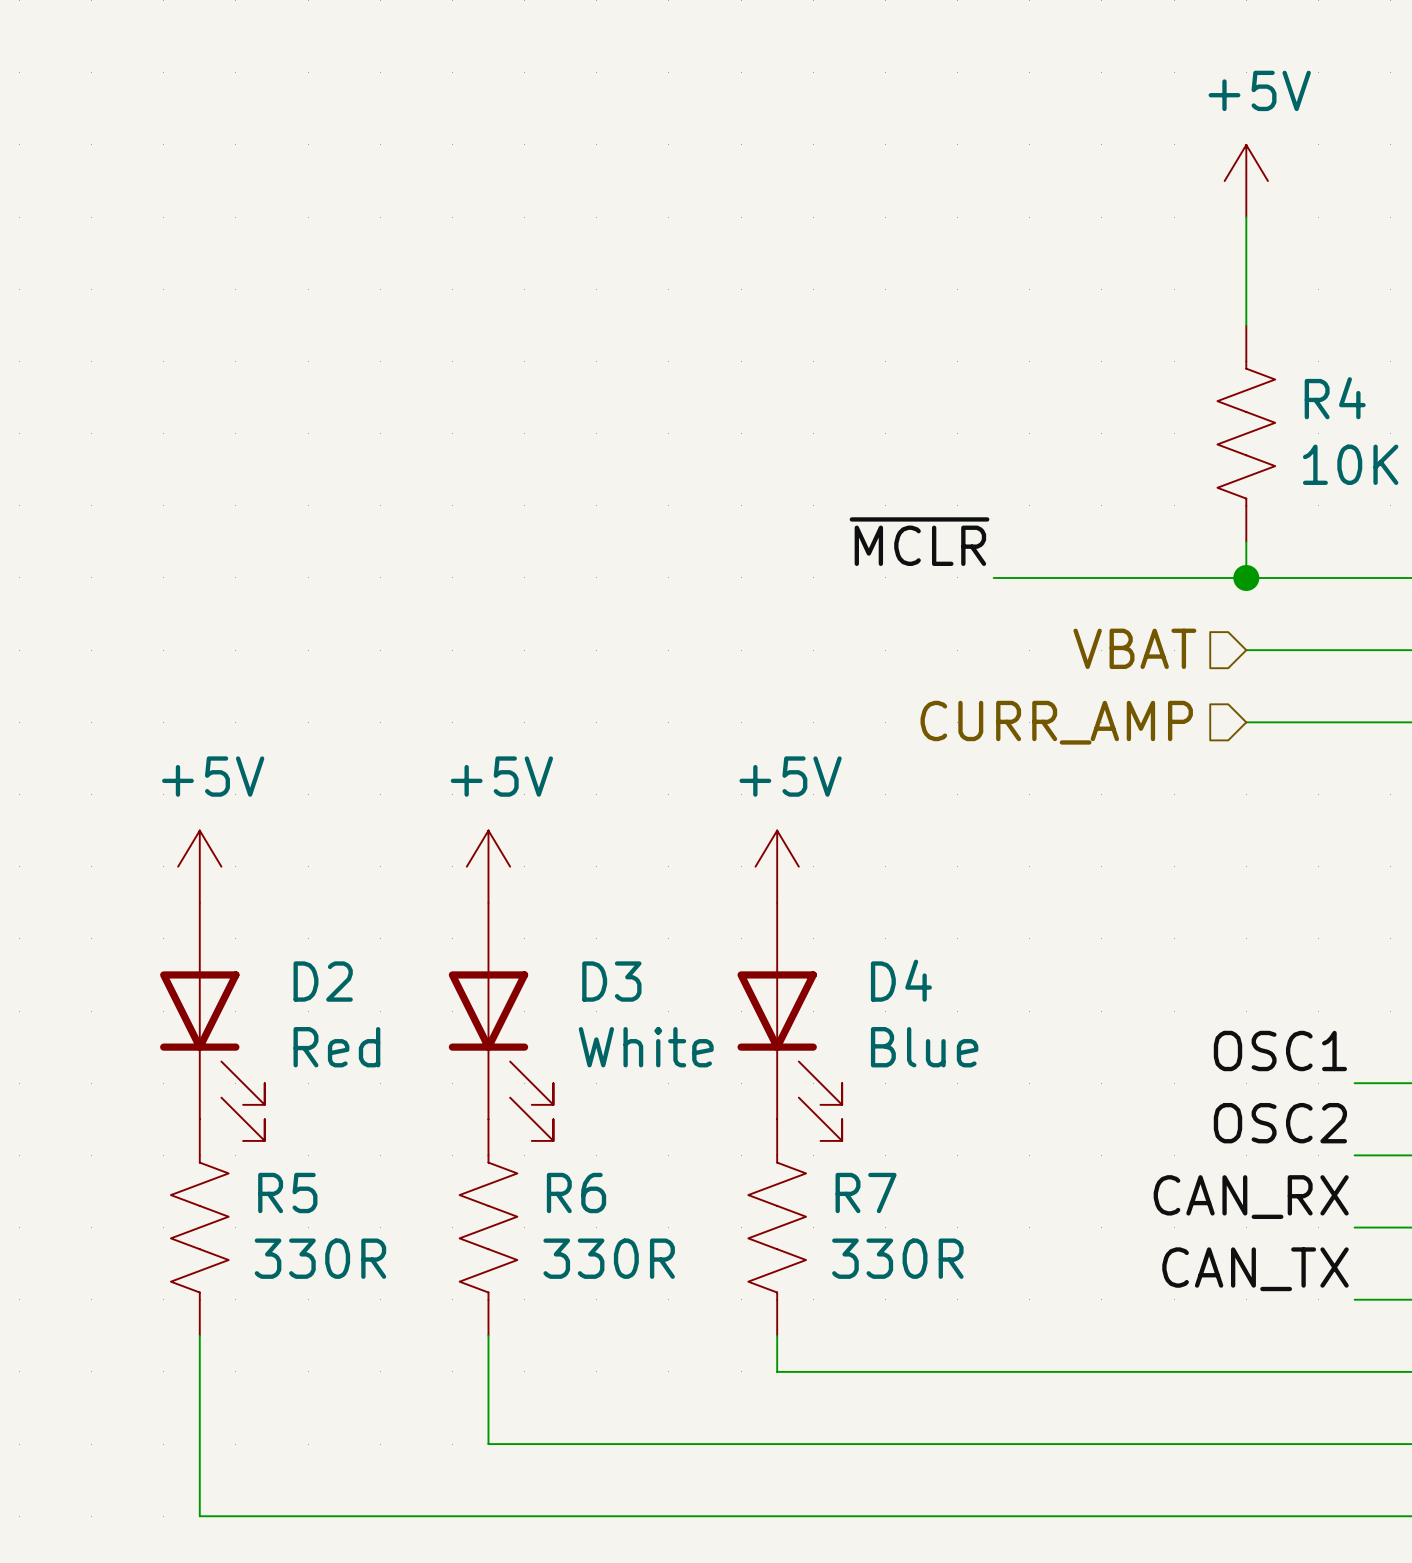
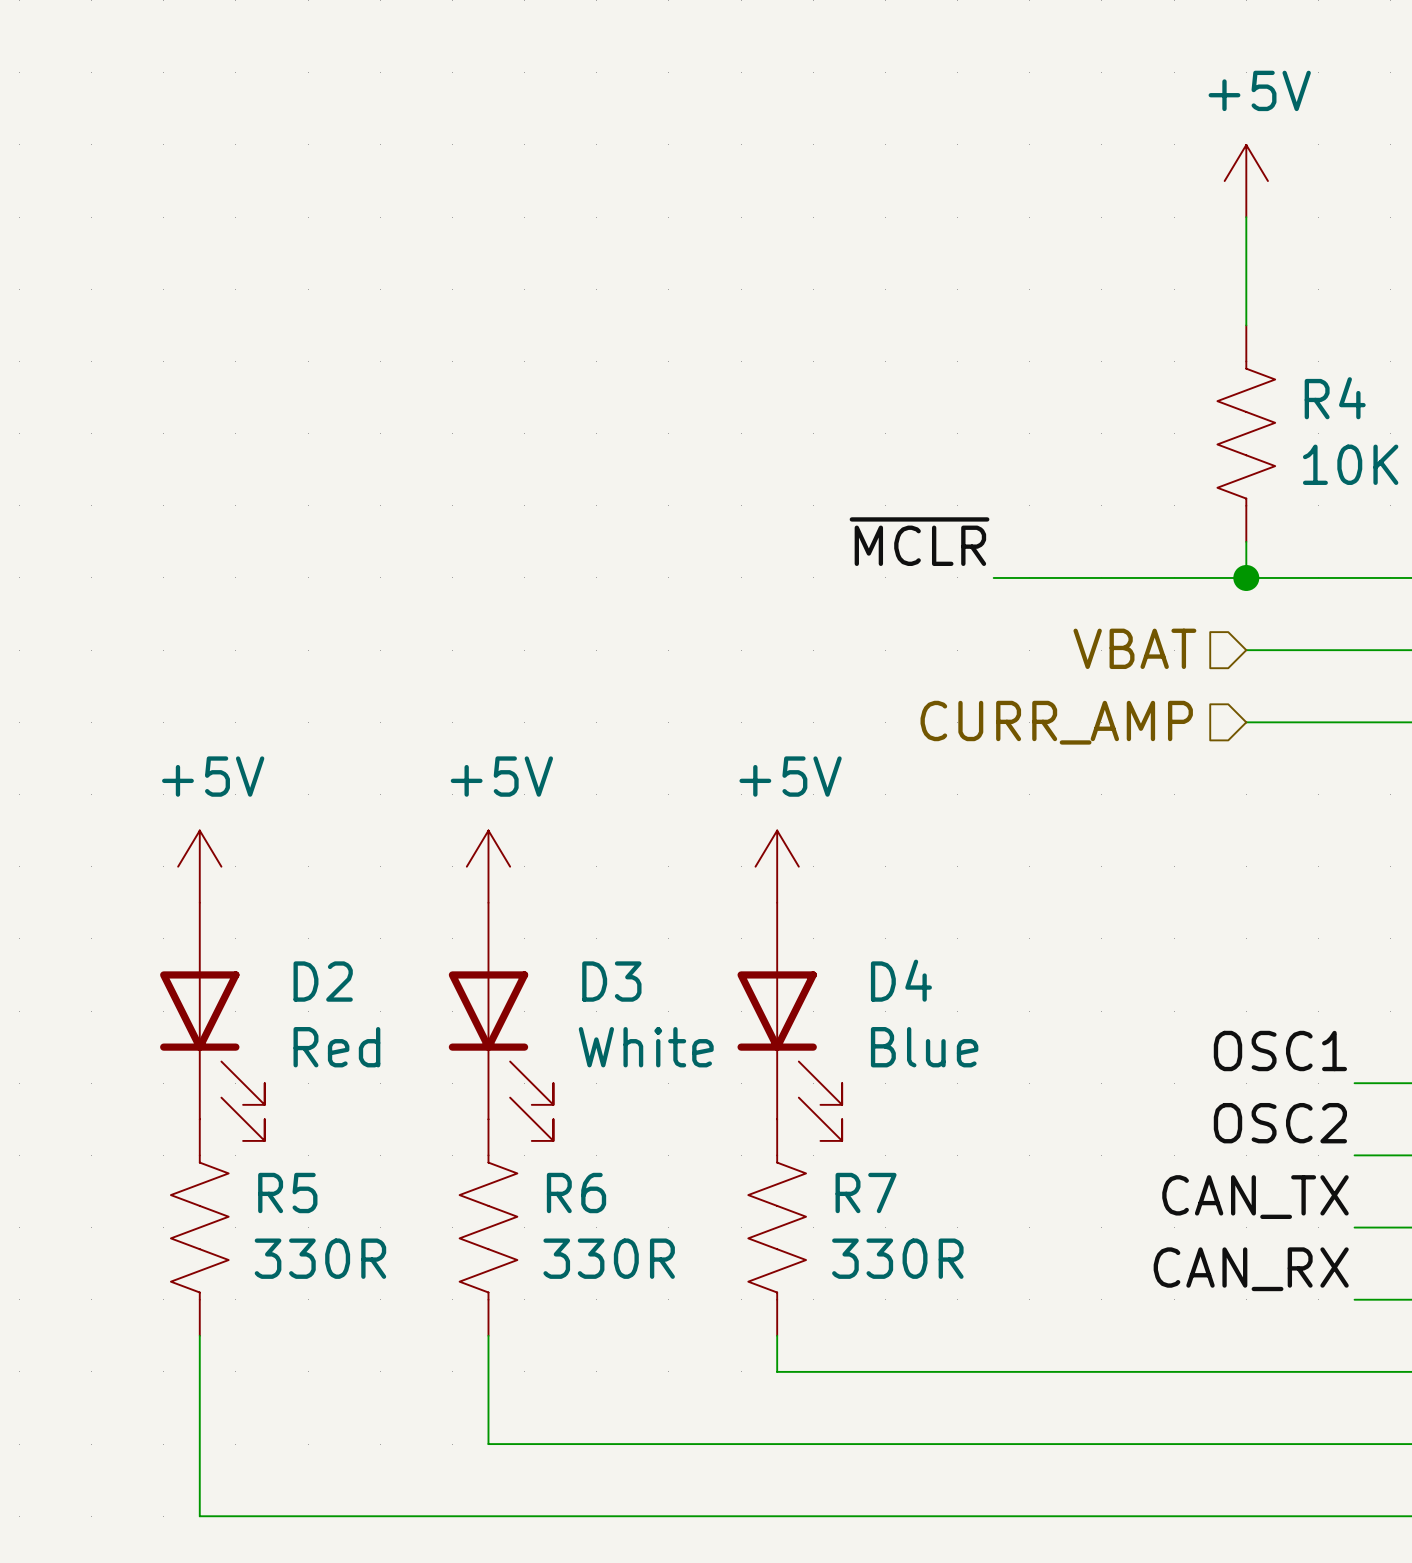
label: CAN_RX (1251, 1197) -> CAN_TX (1255, 1197)
label: CAN_TX (1255, 1269) -> CAN_RX (1251, 1269)

